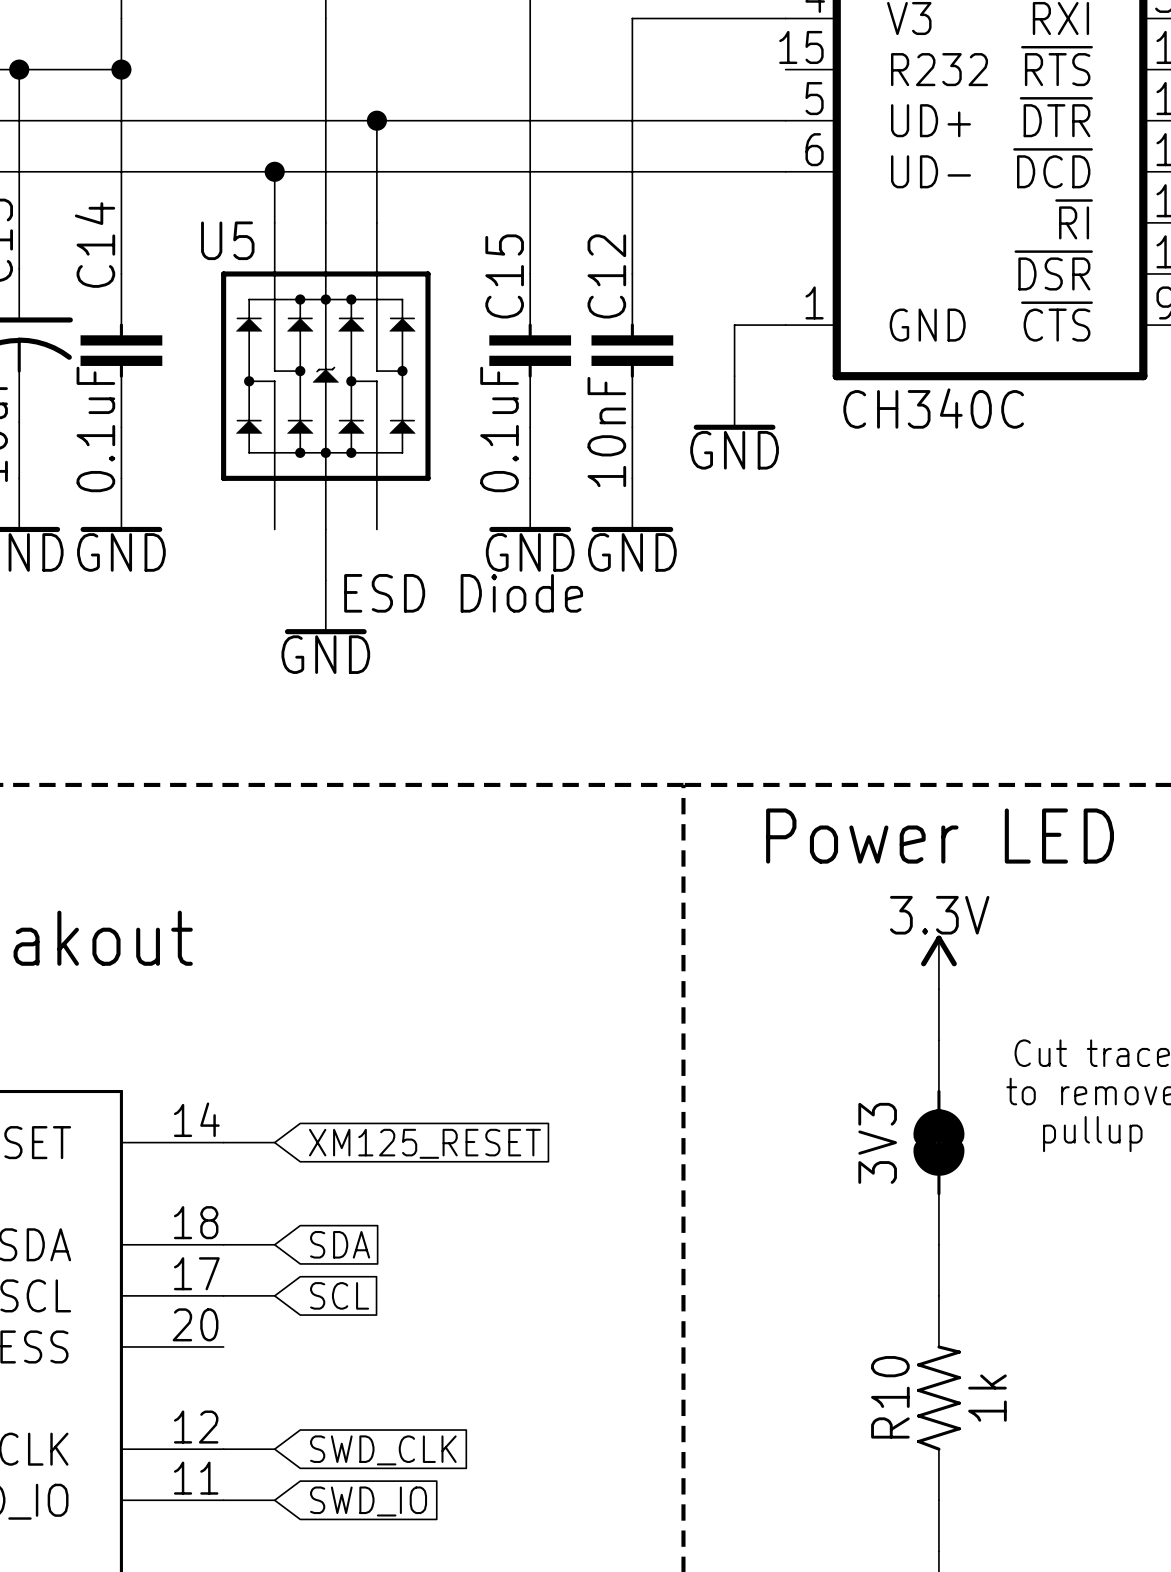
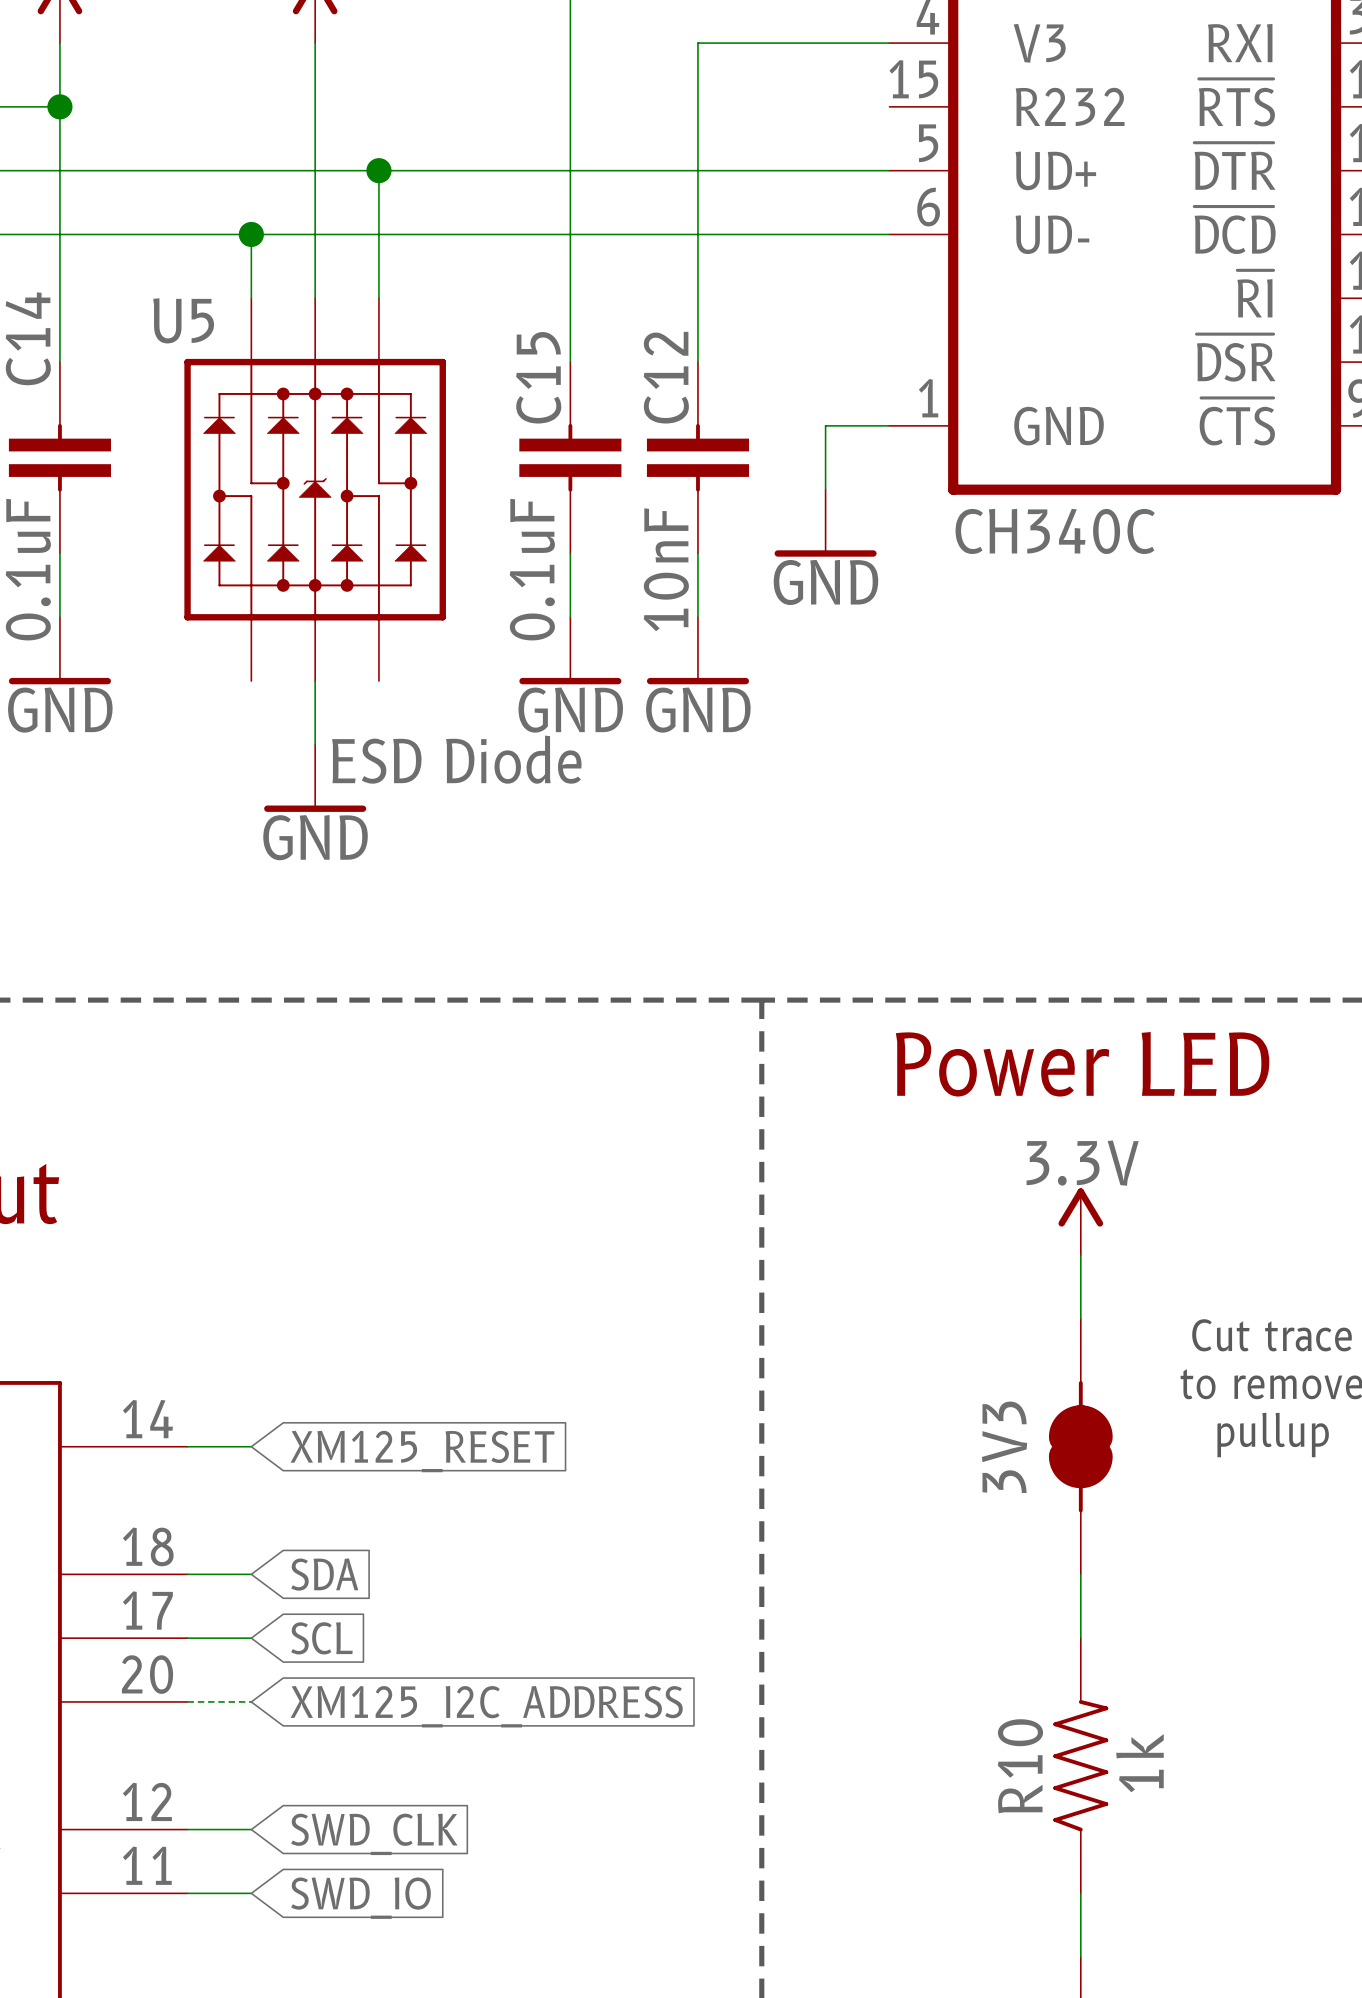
wire: none -> (187, 1701) (251, 1701)
global label: none -> XM125_I2C_ADDRESS (486, 1706)

